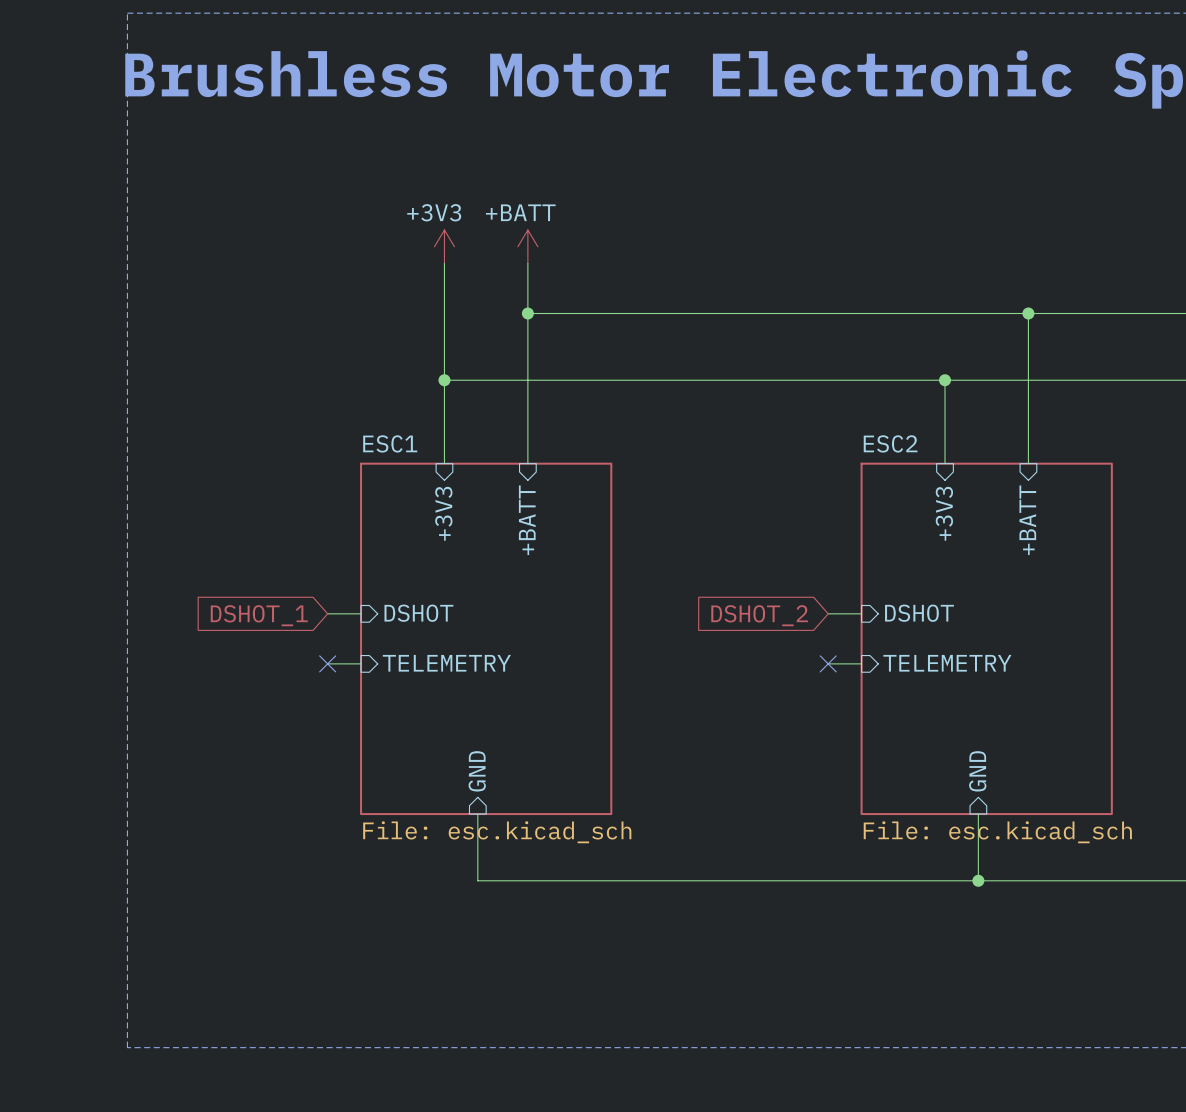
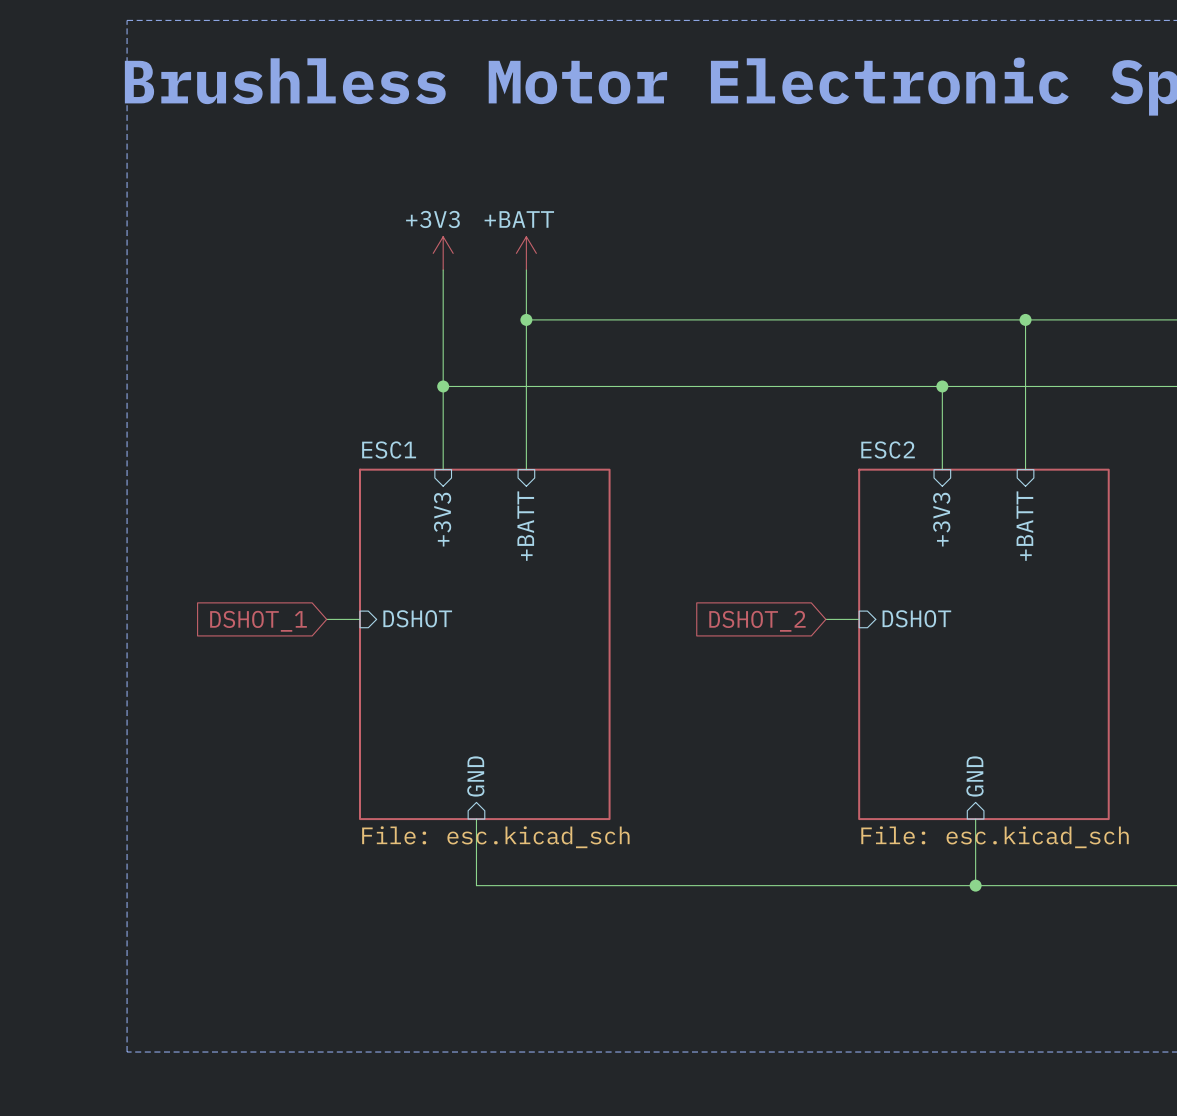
wire: (327, 663) (361, 663) -> none
no-connect mark: (327, 663) -> none
sheet pin: TELEMETRY (446, 663) -> none
wire: (828, 663) (861, 663) -> none
no-connect mark: (828, 663) -> none
sheet pin: TELEMETRY (947, 663) -> none

